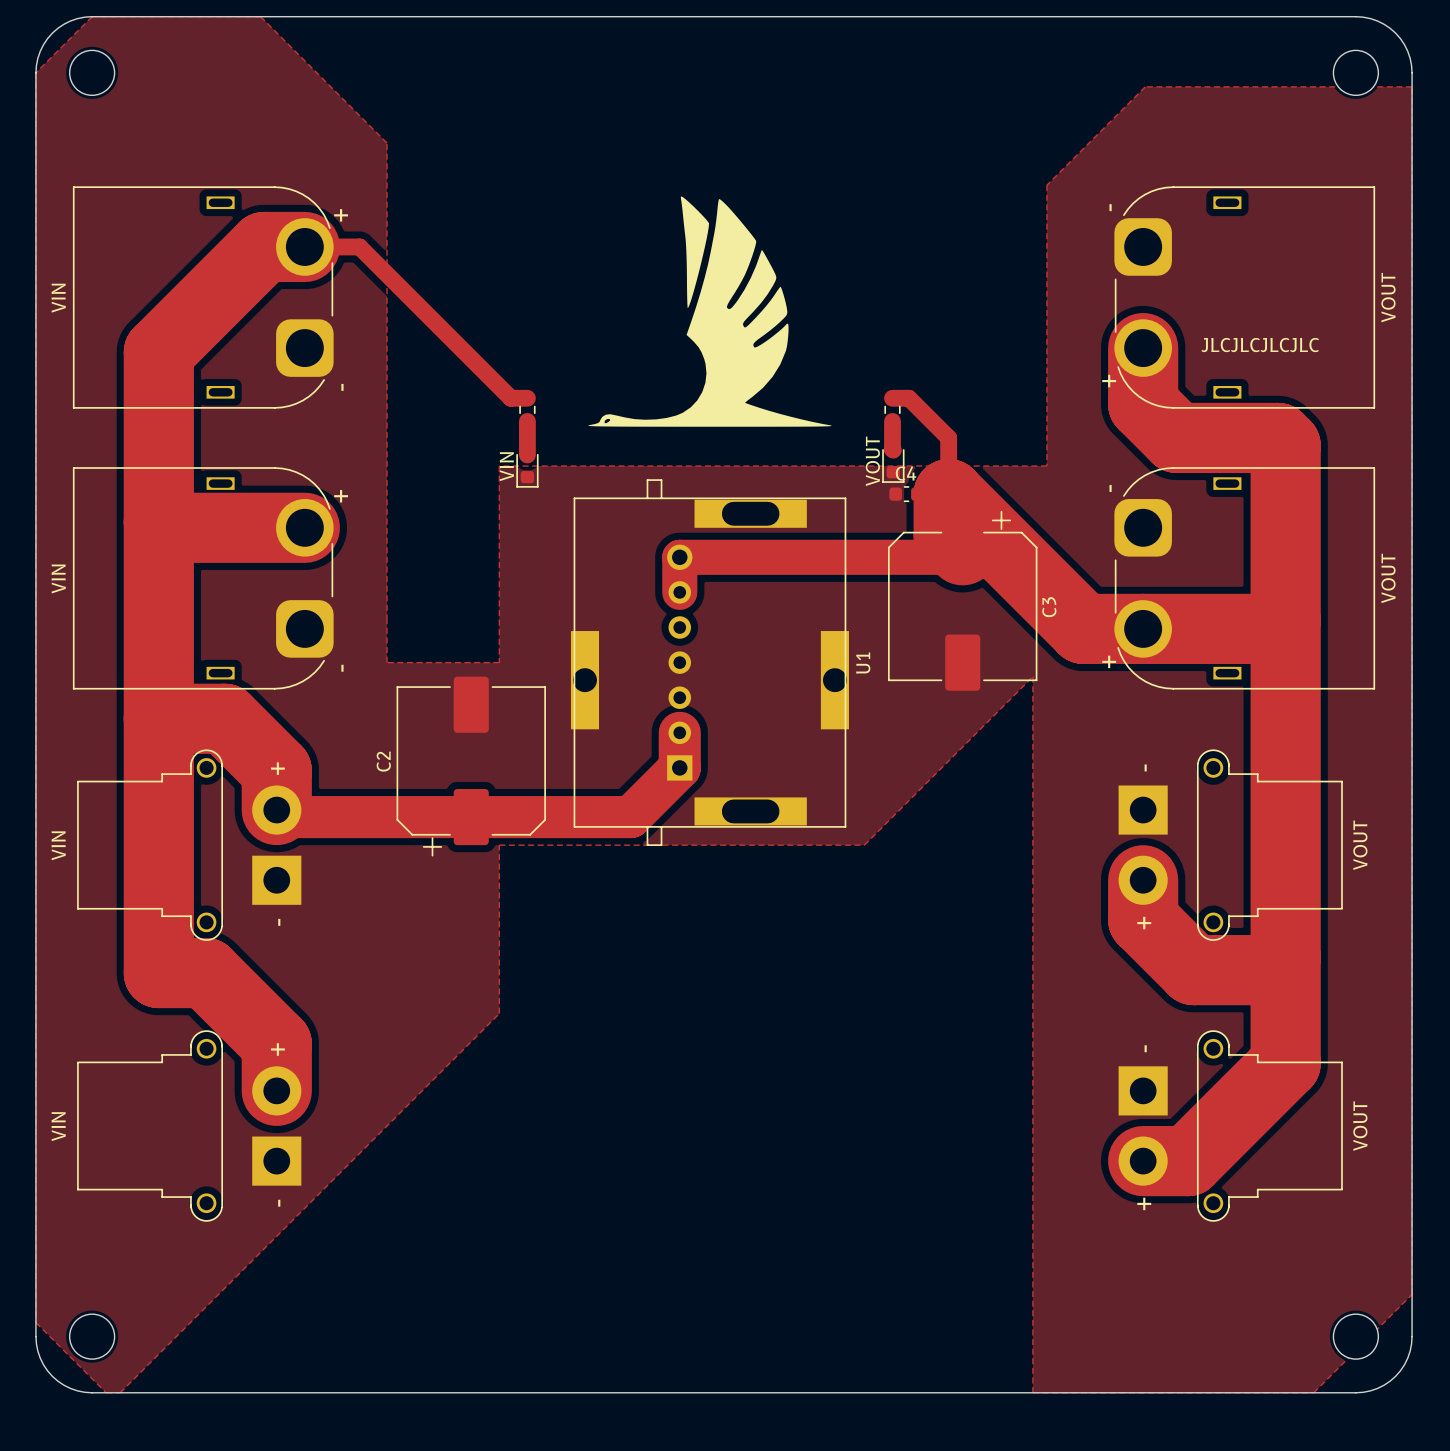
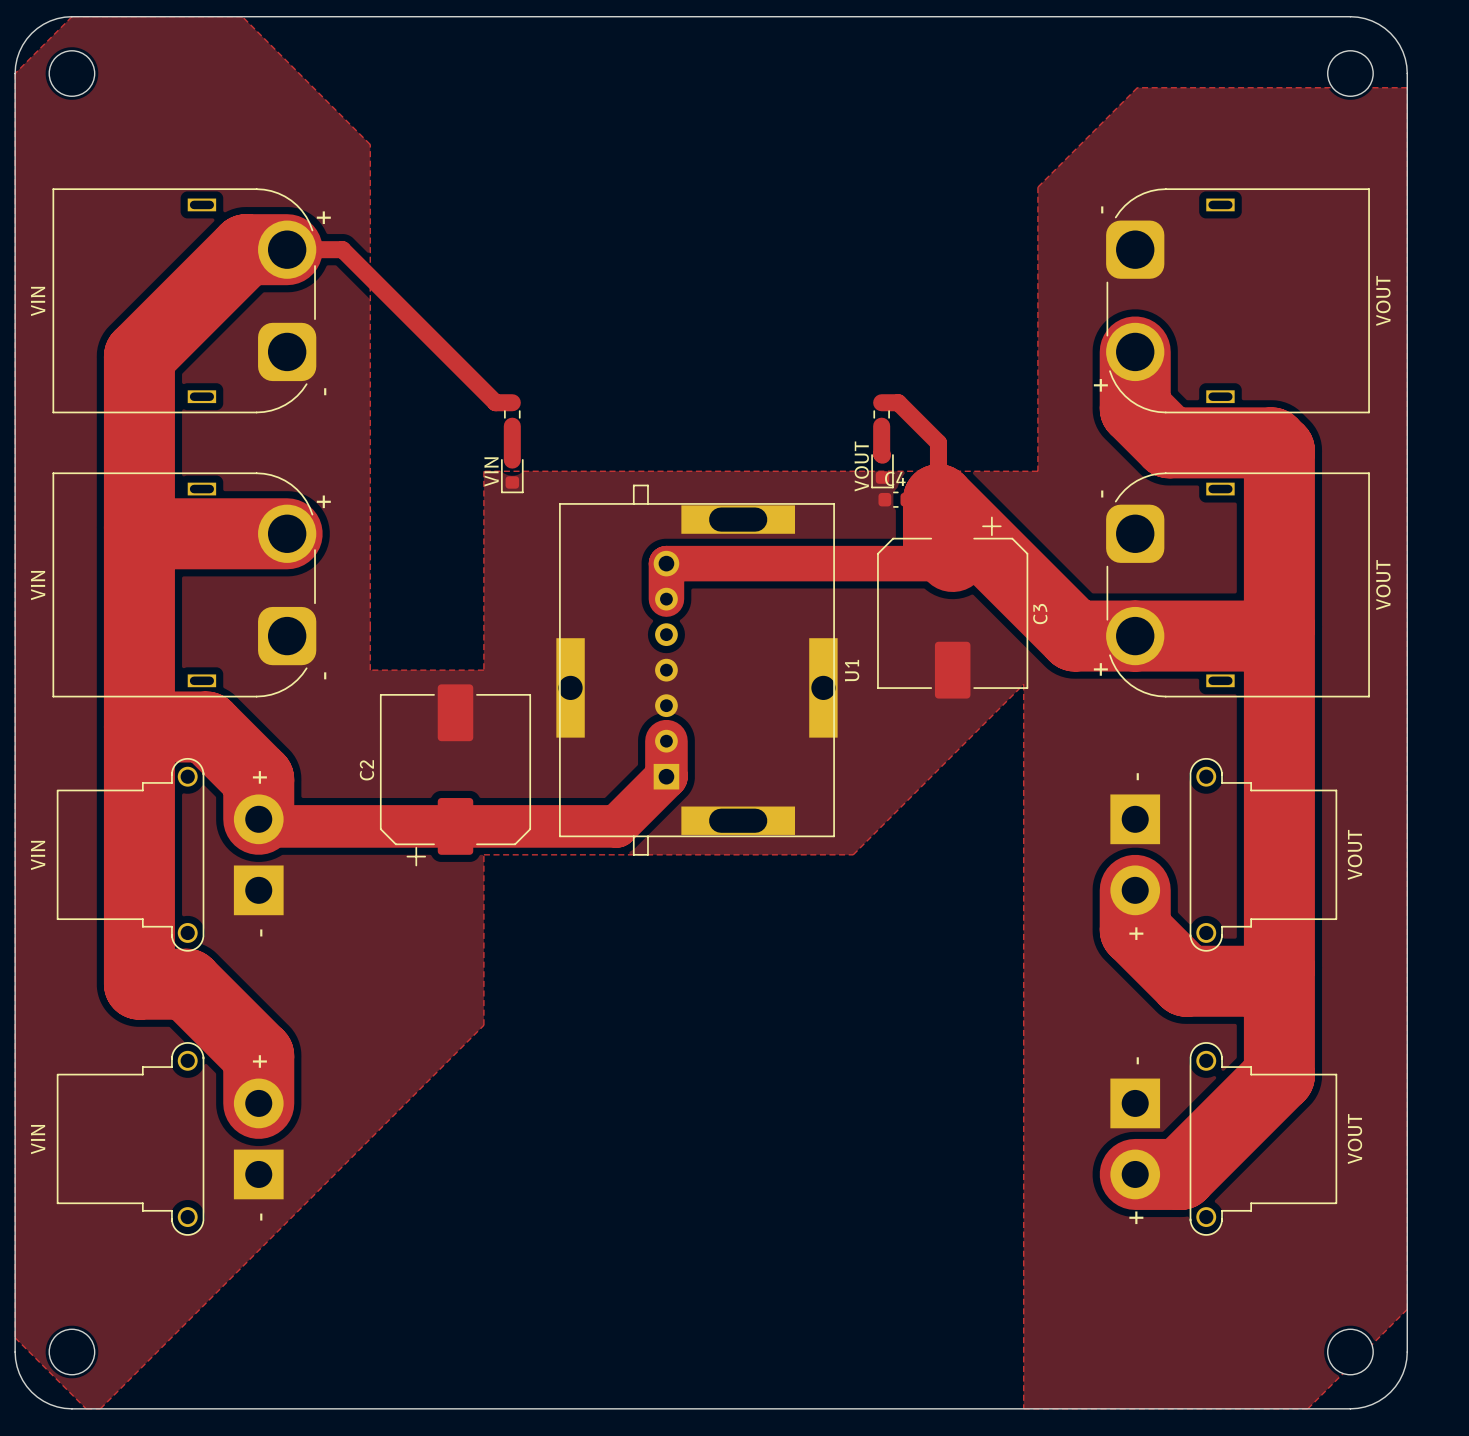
drawing: [588, 196, 832, 427] -> none
text: JLCJLCJLCJLC (1260, 345) -> none

